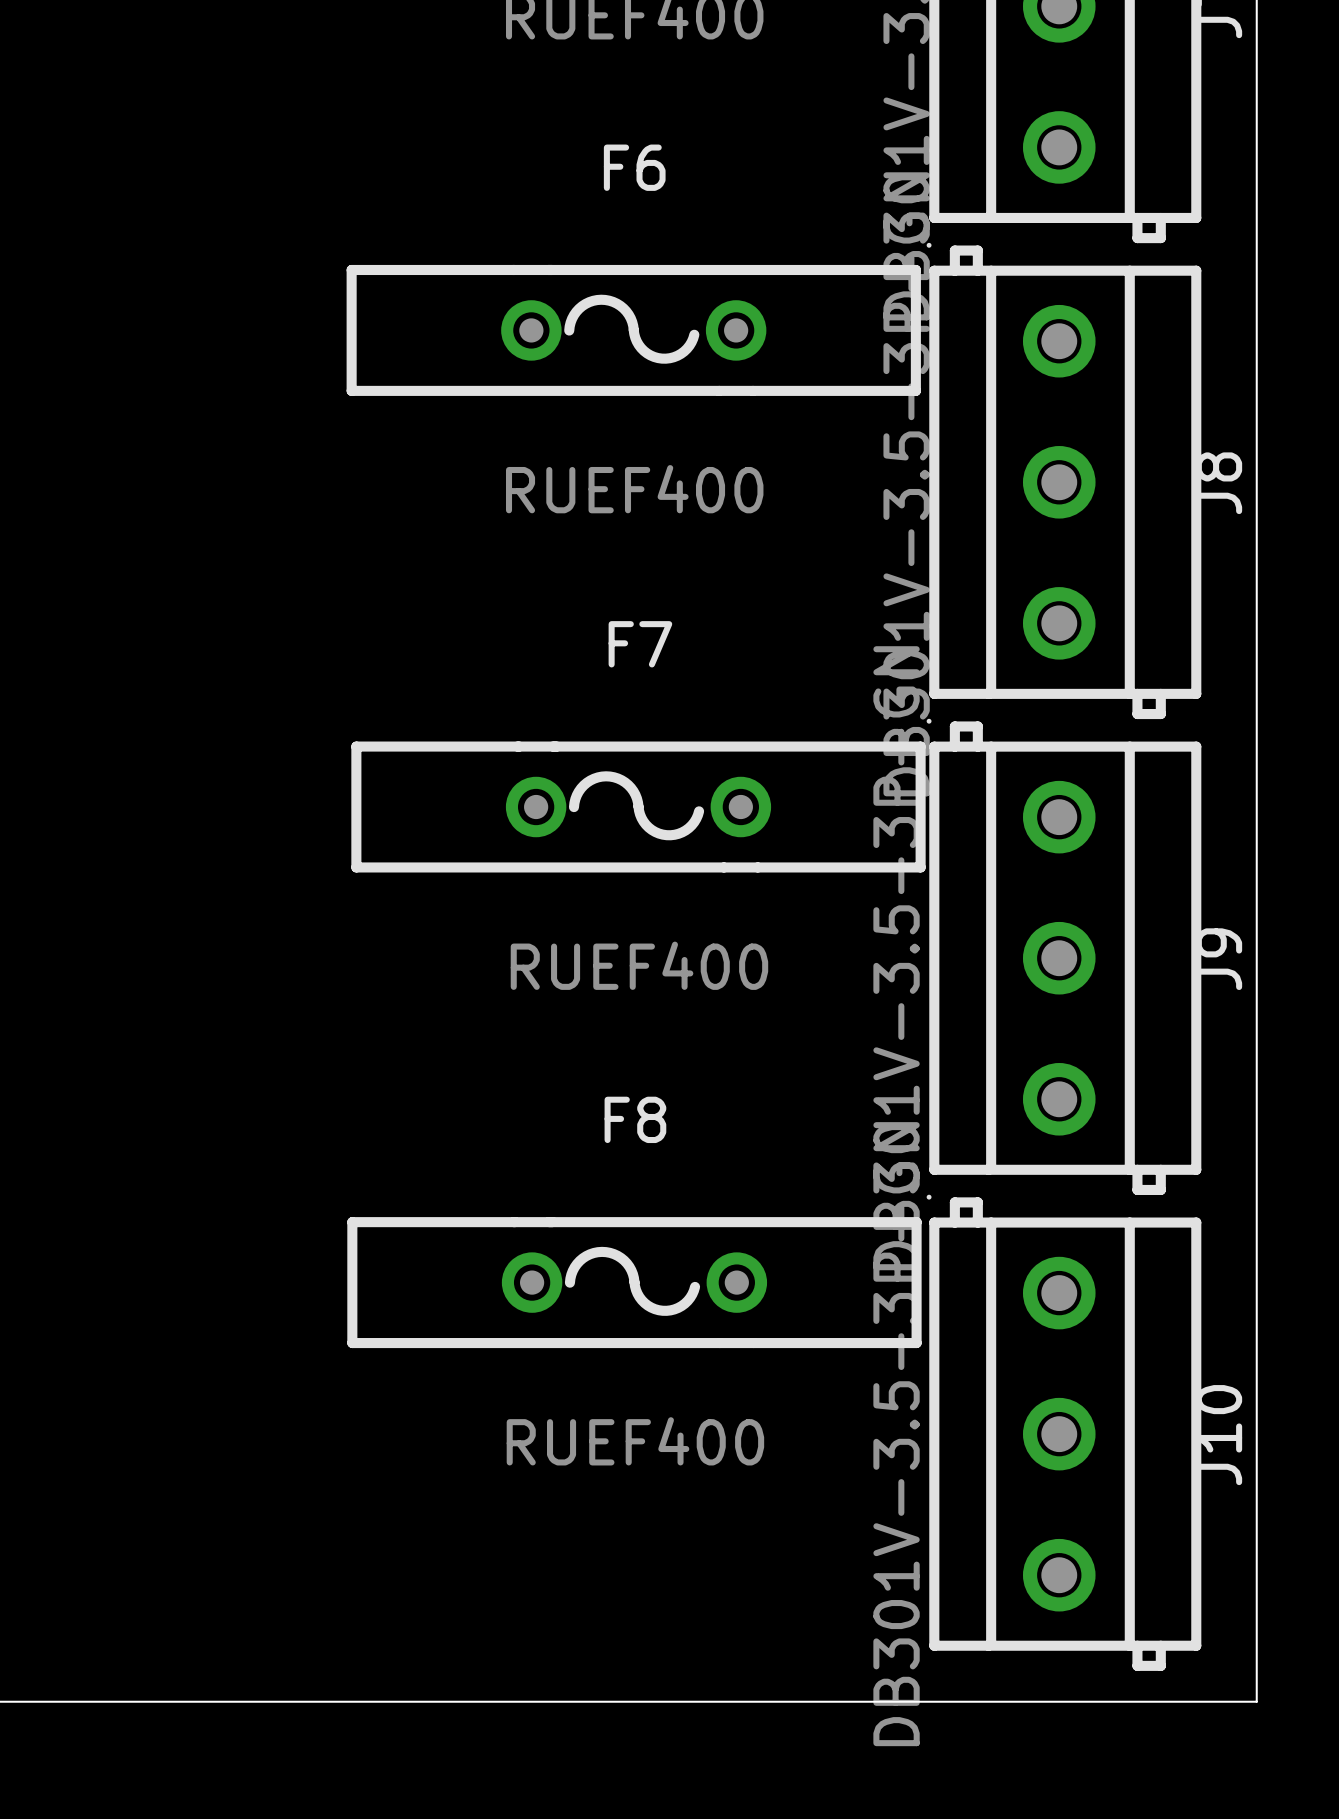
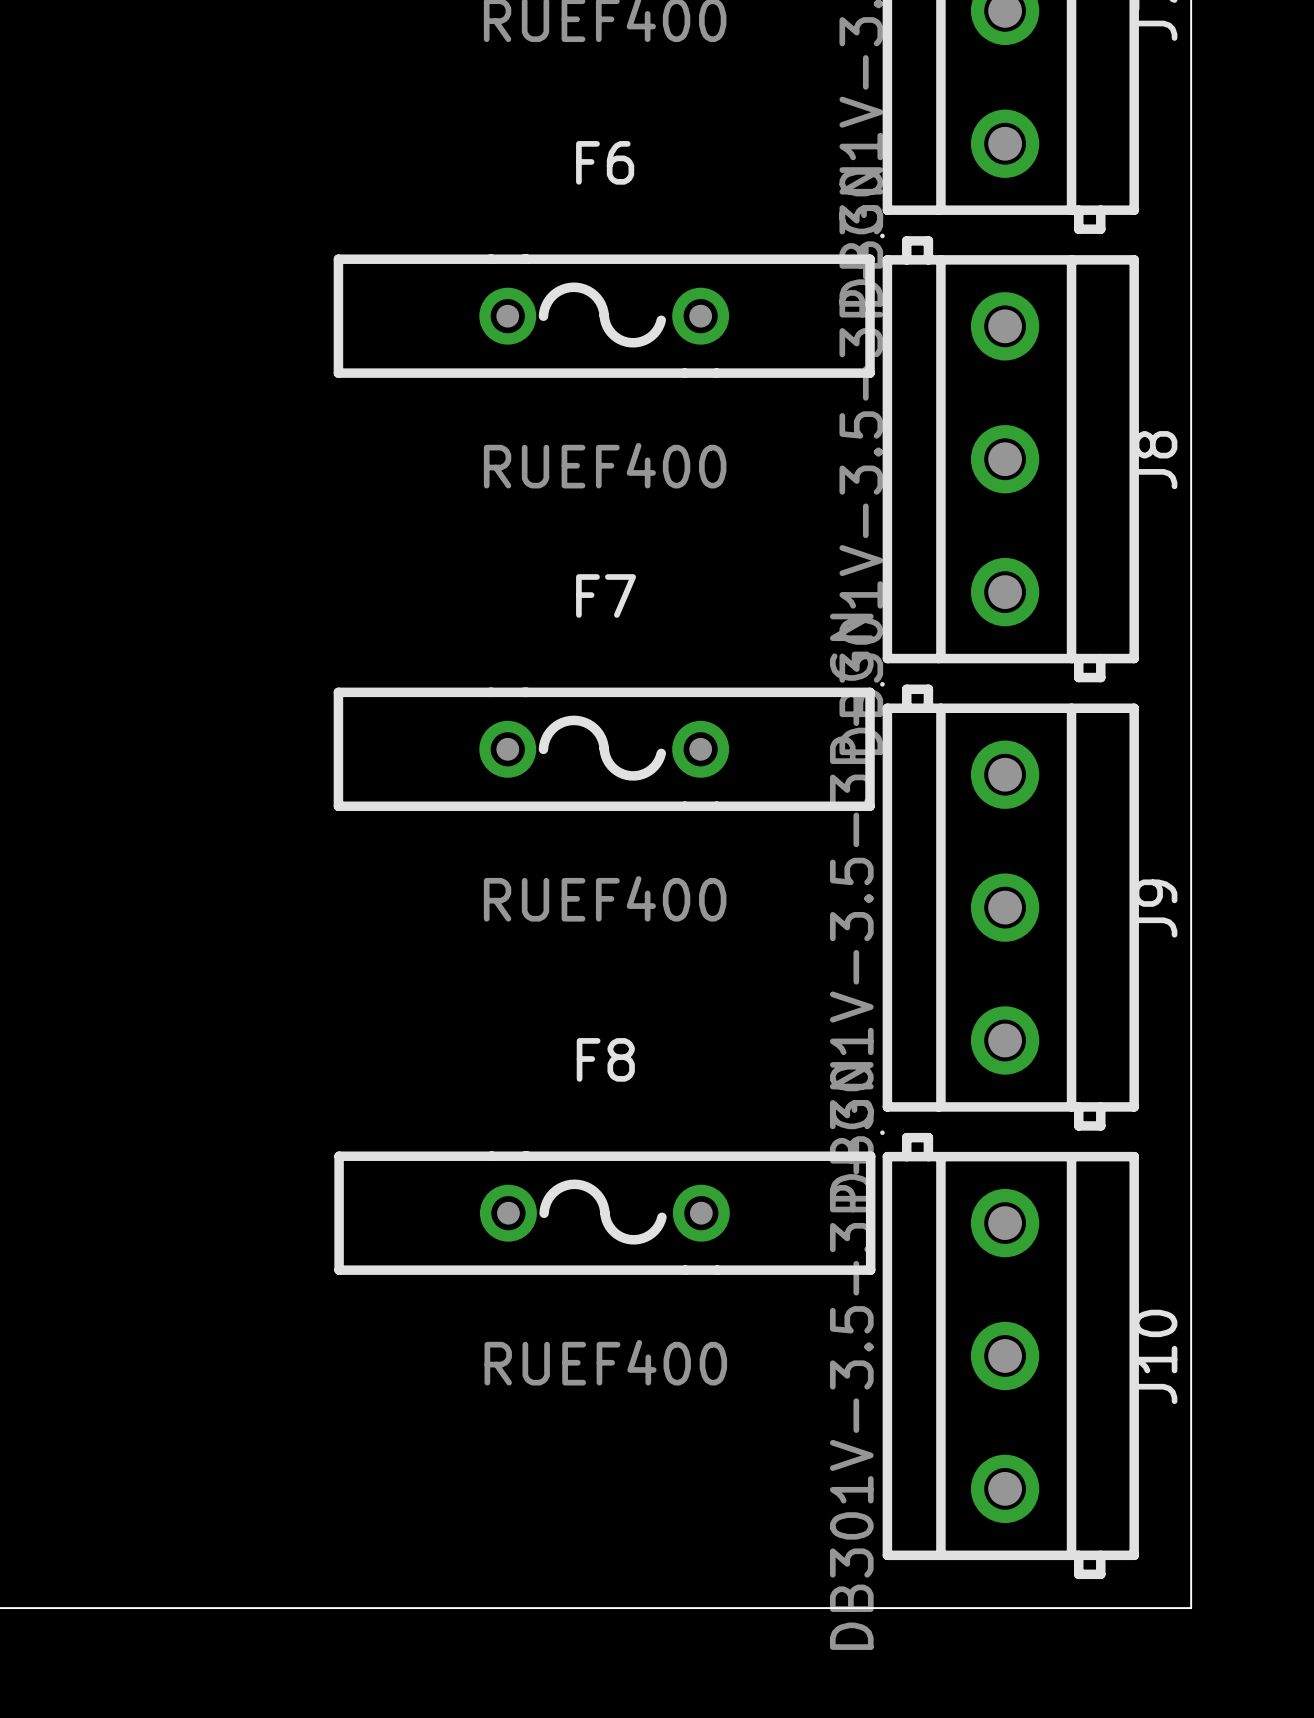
F7 position: (638, 807) -> (604, 749)

